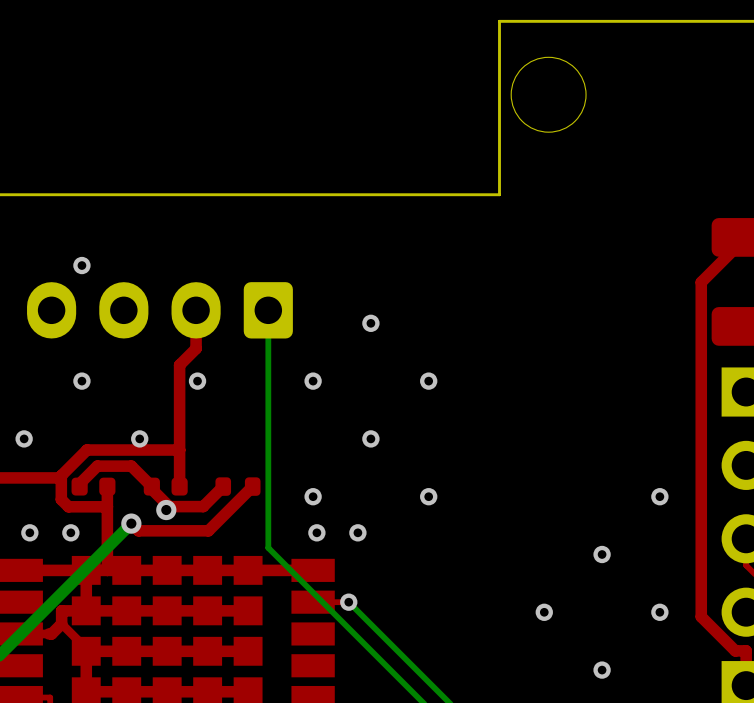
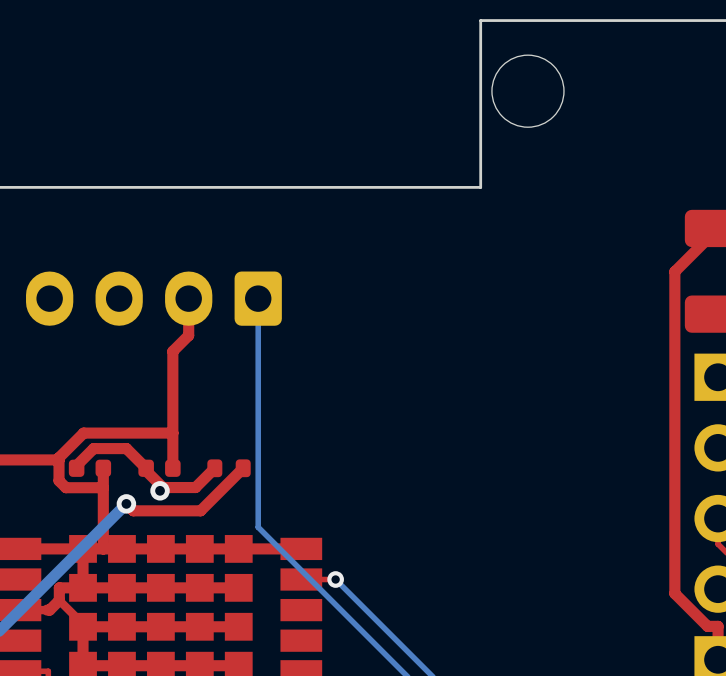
via: (81, 265) -> none
via: (370, 323) -> none
via: (81, 381) -> none
via: (197, 381) -> none
via: (313, 381) -> none
via: (428, 381) -> none
via: (24, 438) -> none
via: (139, 438) -> none
via: (370, 438) -> none
via: (313, 496) -> none
via: (428, 496) -> none
via: (659, 496) -> none
via: (29, 532) -> none
via: (70, 532) -> none
via: (316, 532) -> none
via: (357, 532) -> none
via: (602, 554) -> none
via: (544, 612) -> none
via: (659, 612) -> none
via: (602, 670) -> none

